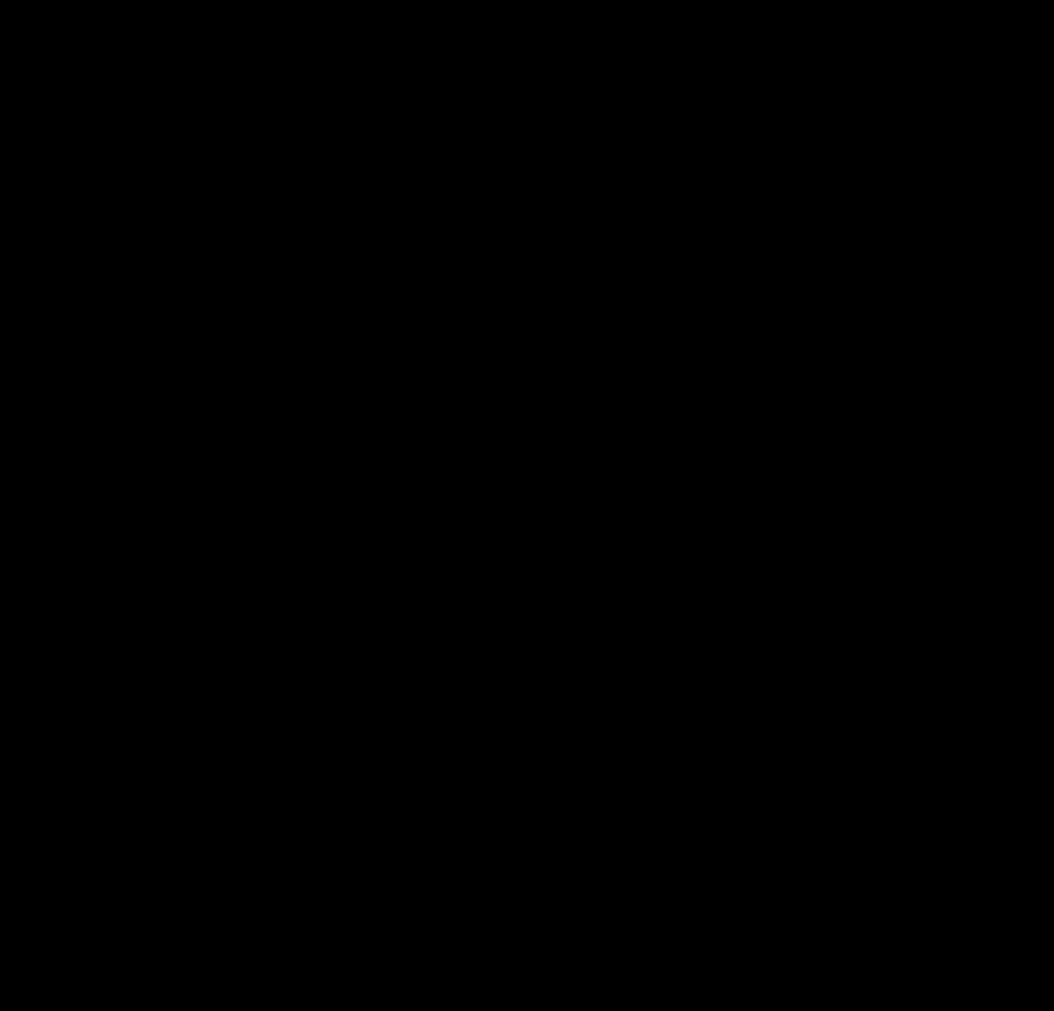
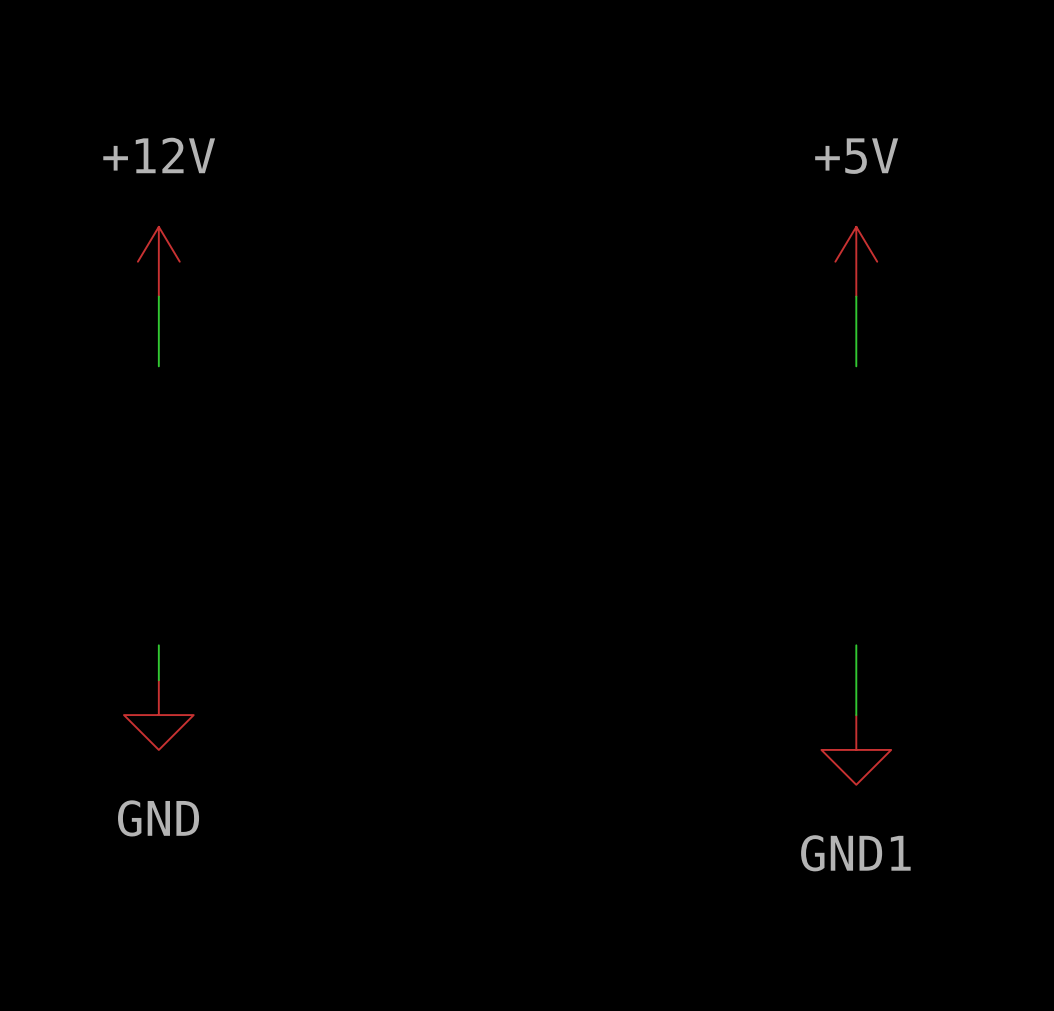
power symbol: none -> +12V (158, 261)
power symbol: none -> +5V (856, 261)
wire: none -> (158, 296) (158, 366)
wire: none -> (856, 296) (856, 366)
wire: none -> (158, 645) (158, 680)
wire: none -> (856, 645) (856, 715)
power symbol: none -> GND (158, 715)
power symbol: none -> GND1 (856, 749)

